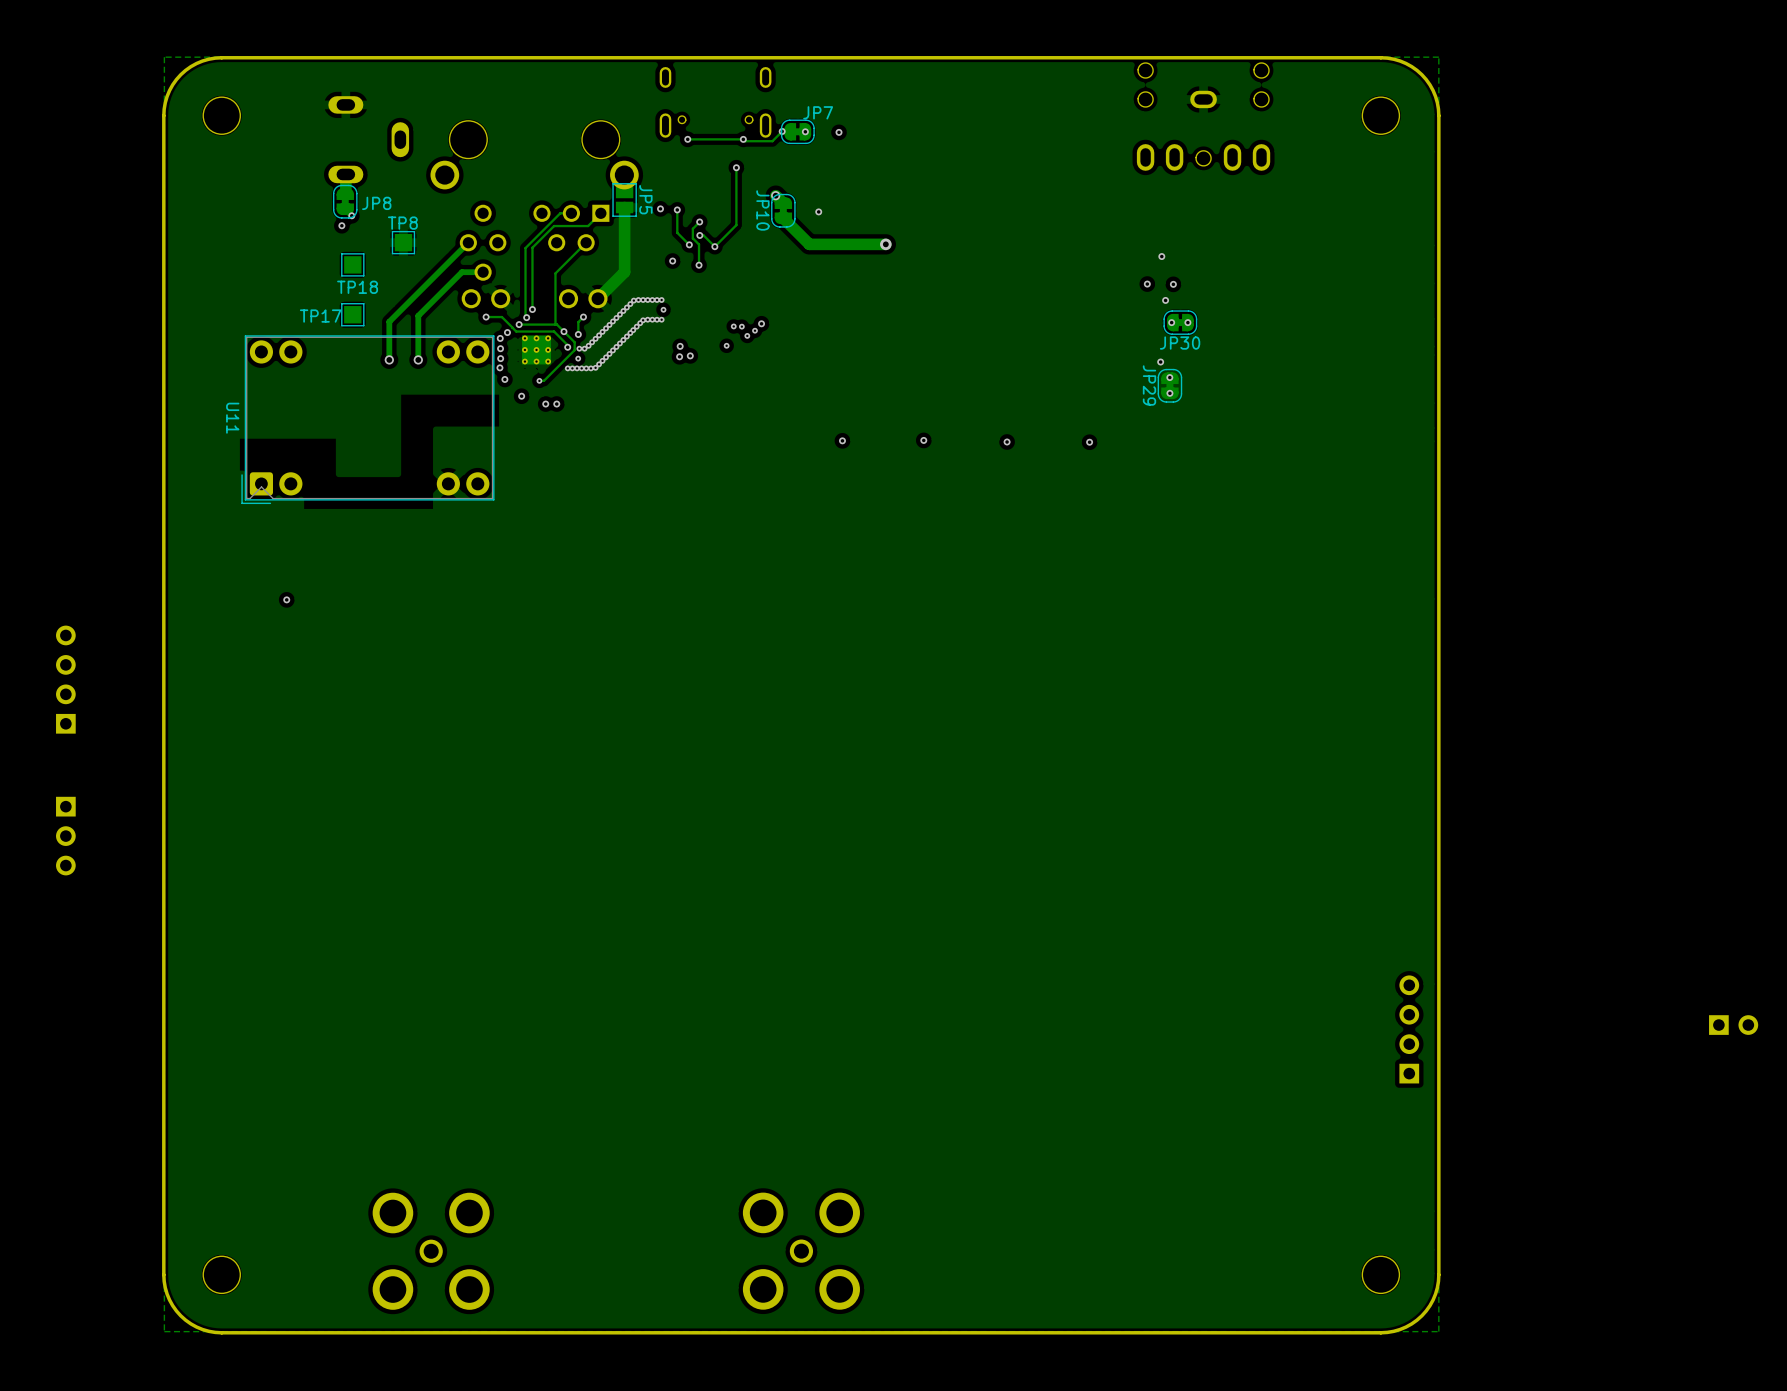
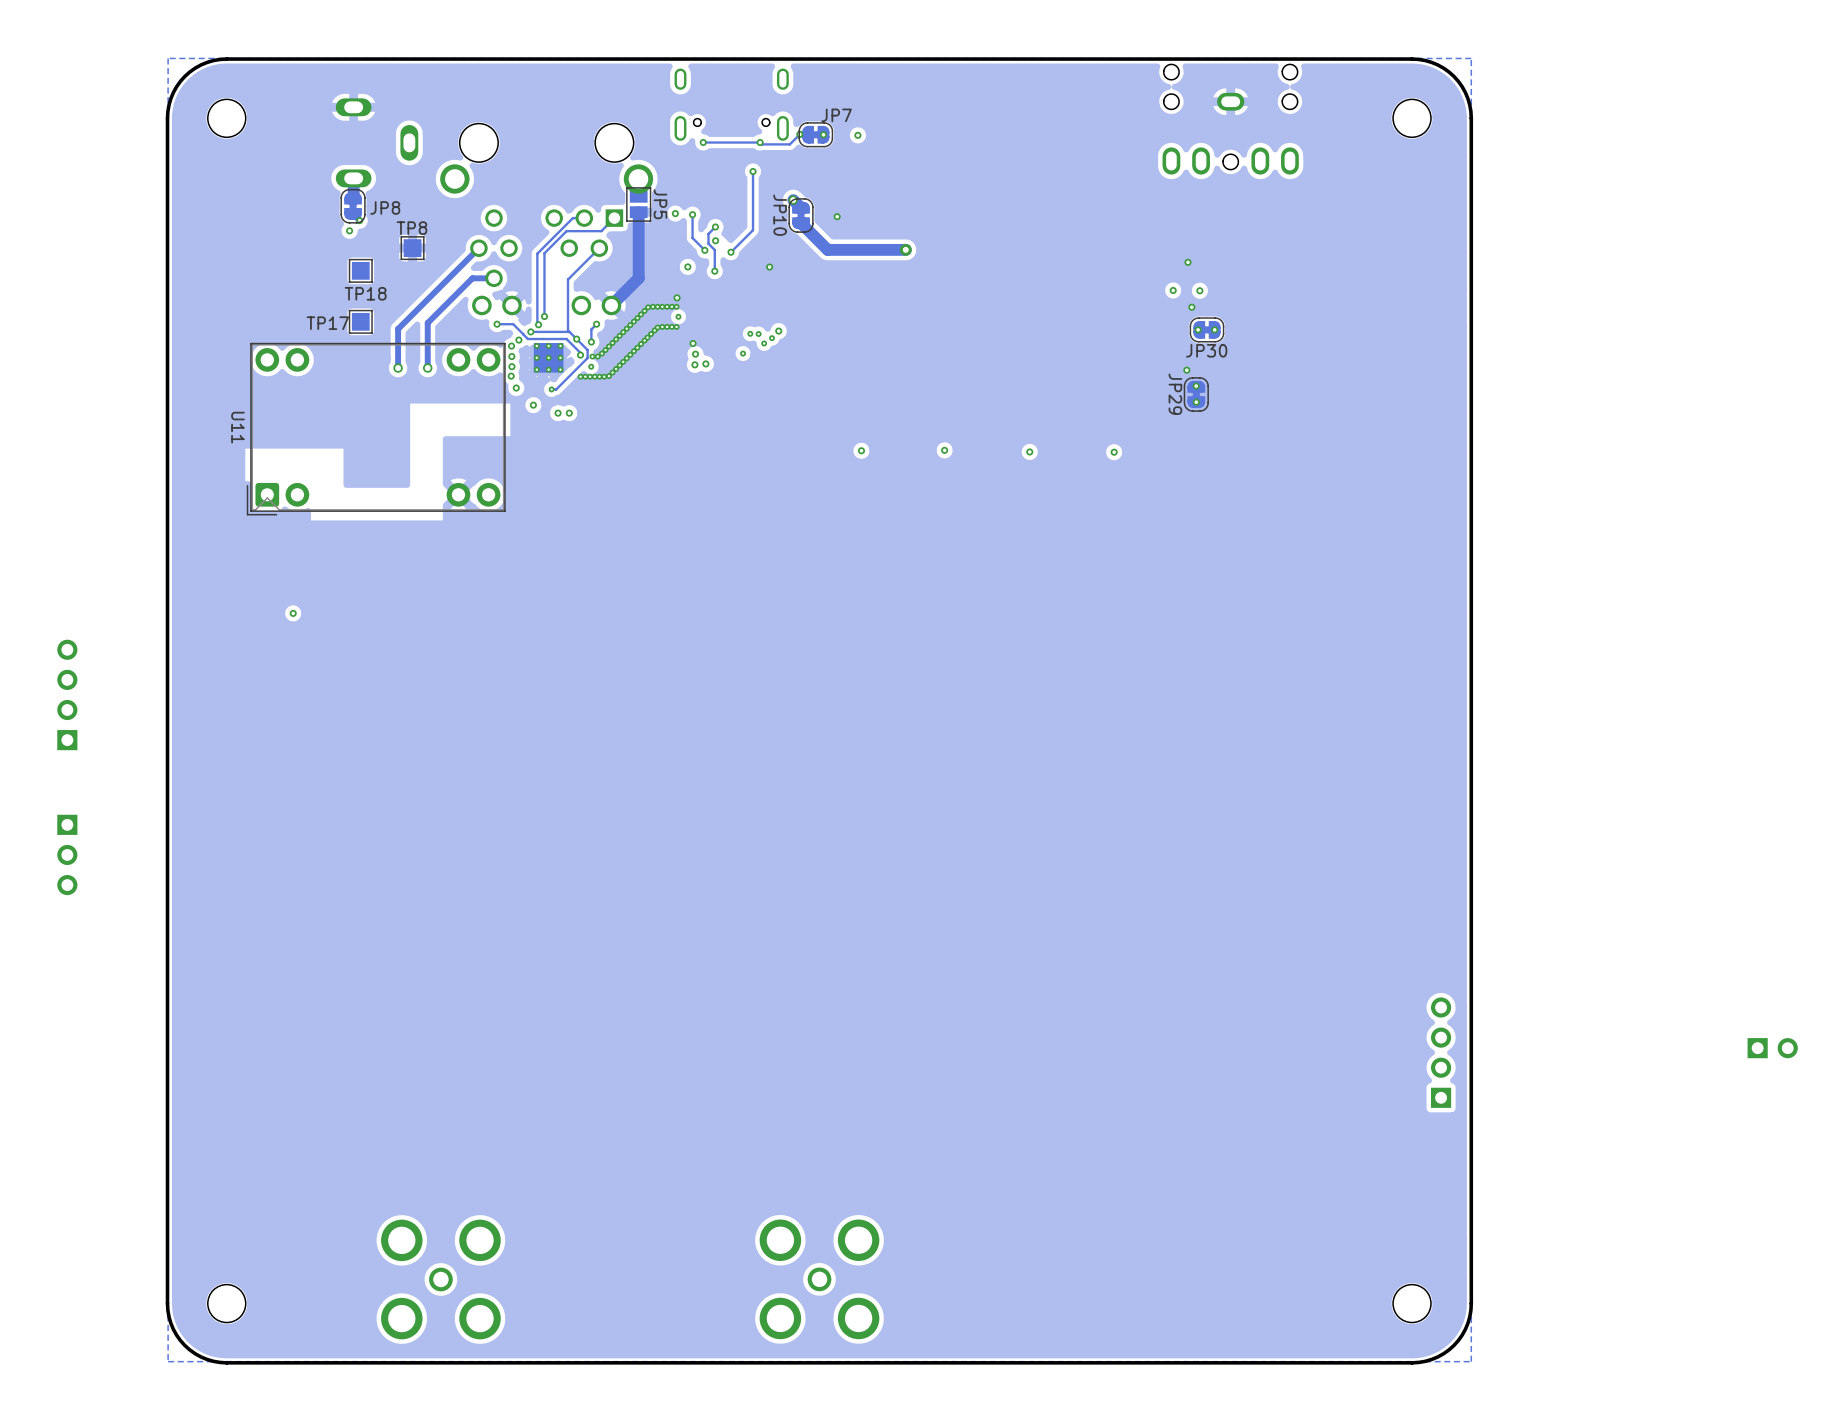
track: (699, 235) (703, 235) (714, 246) -> none
via: none -> (769, 267)
via: none -> (677, 297)
via: none -> (693, 343)

